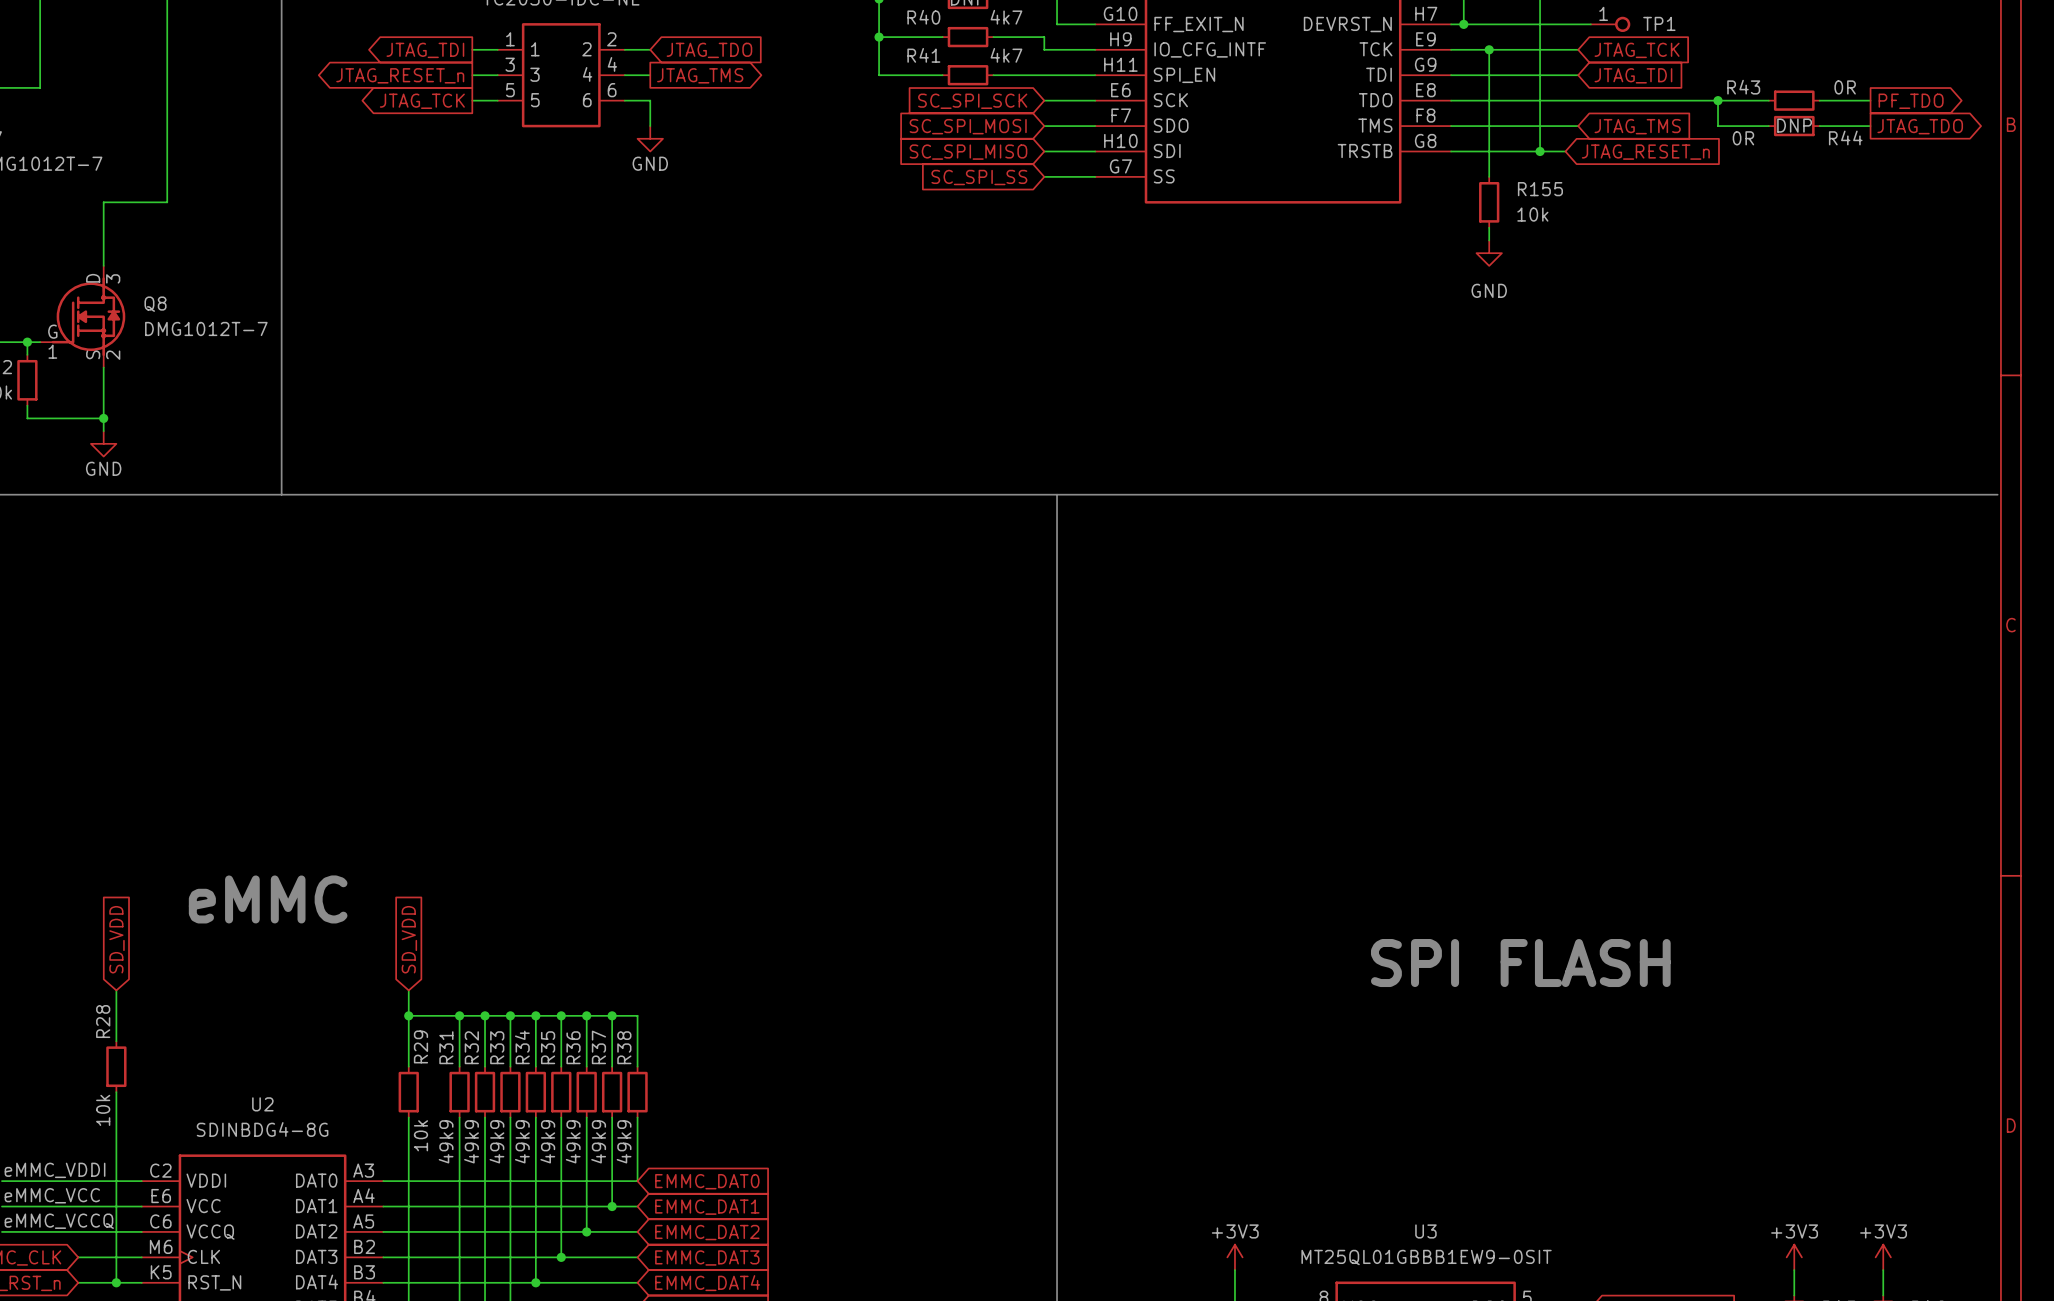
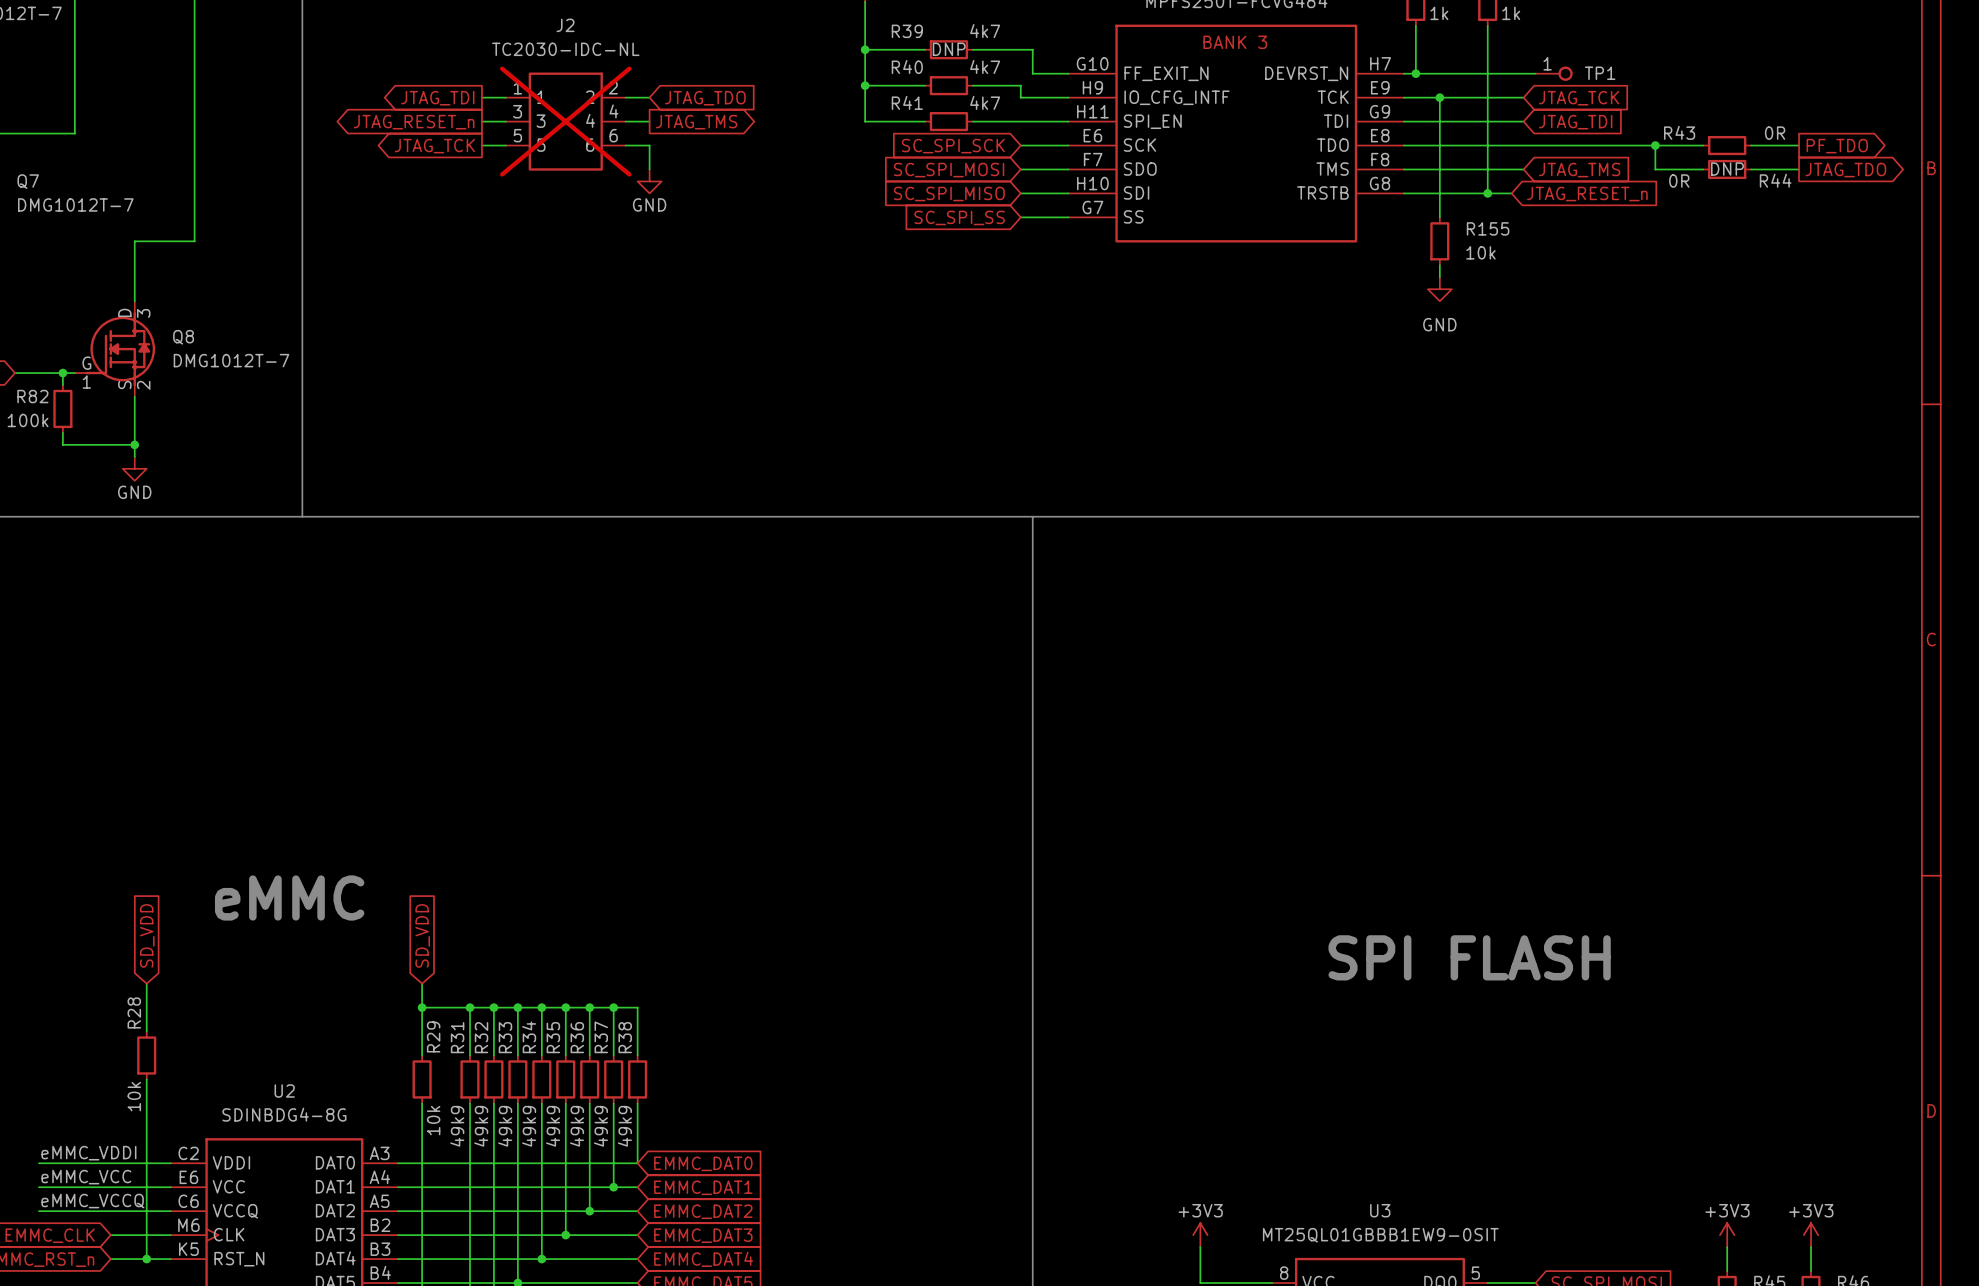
J2 do-not-place cross: none -> (565, 121)

